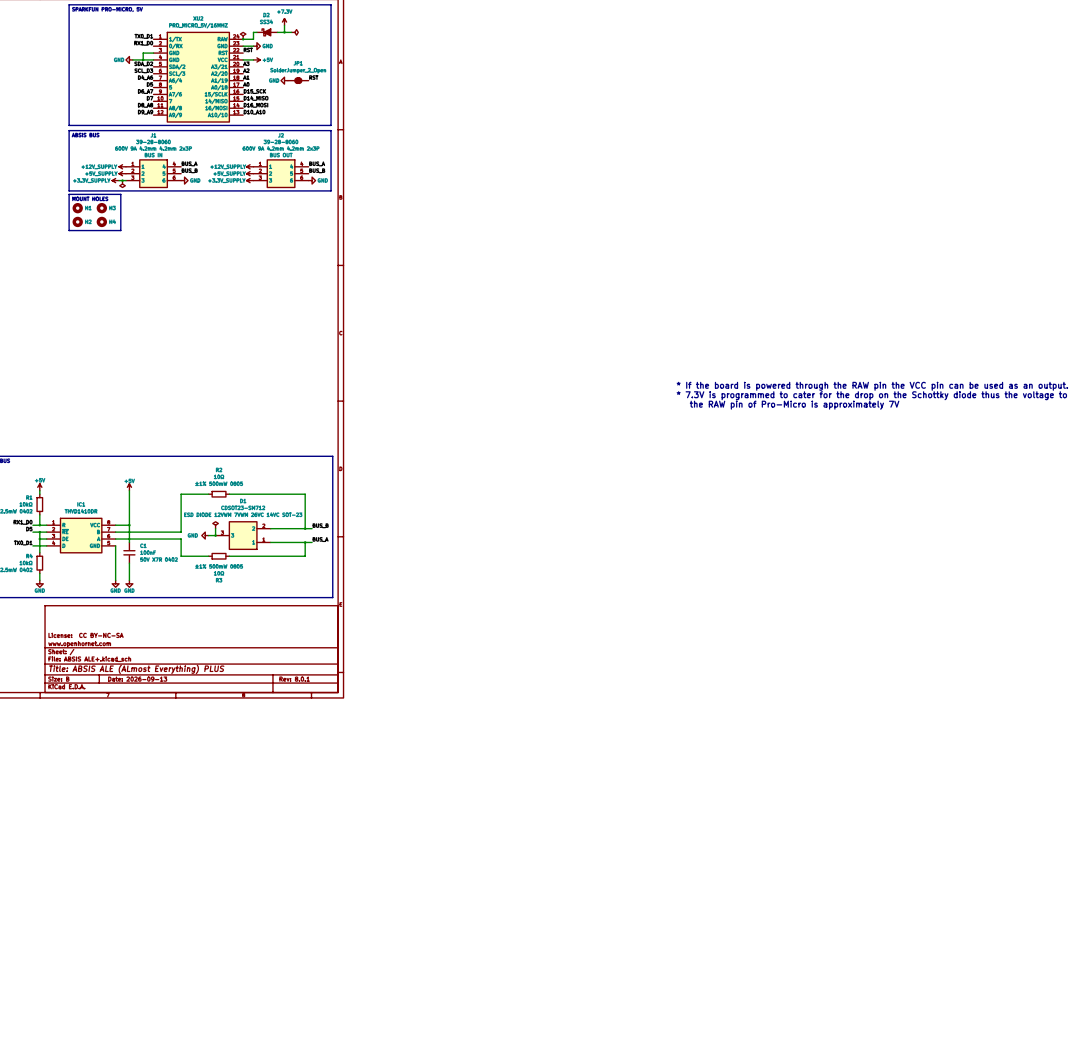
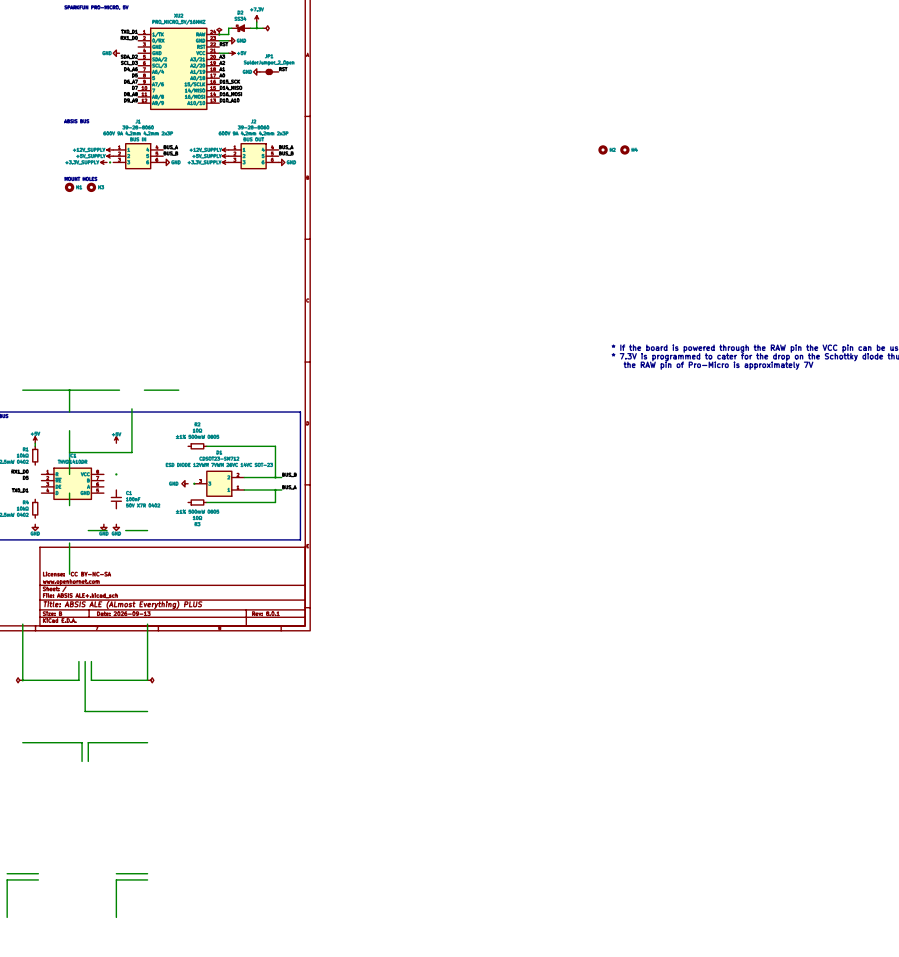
line: (69, 4) (69, 125) (331, 125) (331, 4) (69, 4) -> none
wire: (153, 53) (143, 53) (143, 59) -> none
wire: (132, 59) (153, 59) -> none
line: (69, 130) (69, 190) (331, 190) (331, 130) (69, 130) -> none
wire: (119, 180) (125, 180) -> none
power symbol: (122, 184) -> none
line: (69, 194) (120, 194) (120, 230) (69, 230) (69, 194) -> none
part position: (77, 221) -> (603, 149)
part position: (101, 221) -> (624, 149)
wire: none -> (22, 390) (119, 390)
wire: none -> (69, 390) (69, 412)
wire: none -> (144, 390) (178, 390)
wire: none -> (131, 408) (131, 452) (69, 452)
wire: none -> (69, 430) (69, 474)
wire: (129, 490) (129, 542) -> none
wire: (208, 494) (181, 494) (181, 532) (115, 532) -> none
wire: (39, 514) (39, 525) -> none
wire: (32, 525) (46, 525) -> none
wire: (115, 525) (129, 525) -> none
power symbol: (215, 525) -> none
wire: (215, 528) (215, 535) (208, 535) -> none
wire: (32, 532) (46, 532) -> none
wire: (39, 532) (39, 552) -> none
wire: (39, 539) (46, 539) -> none
wire: (115, 539) (181, 539) (181, 556) (208, 556) -> none
wire: (32, 545) (46, 545) -> none
wire: none -> (69, 493) (69, 505)
wire: (115, 545) (115, 580) -> (69, 543) (69, 574)
wire: (129, 563) (129, 580) -> none
wire: (39, 573) (39, 580) -> none
wire: none -> (88, 530) (107, 530)
wire: none -> (125, 530) (147, 530)
wire: none -> (22, 624) (22, 680) (78, 680) (78, 661)
wire: none -> (147, 624) (147, 680) (91, 680) (91, 661)
wire: none -> (85, 661) (85, 711) (147, 711)
power symbol: none -> (19, 680)
power symbol: none -> (150, 680)
wire: none -> (22, 742) (82, 742) (82, 761)
wire: none -> (147, 742) (88, 742) (88, 761)
wire: none -> (7, 873) (38, 873)
wire: none -> (116, 873) (147, 873)
wire: none -> (38, 879) (7, 879) (7, 917)
wire: none -> (147, 879) (116, 879) (116, 917)

